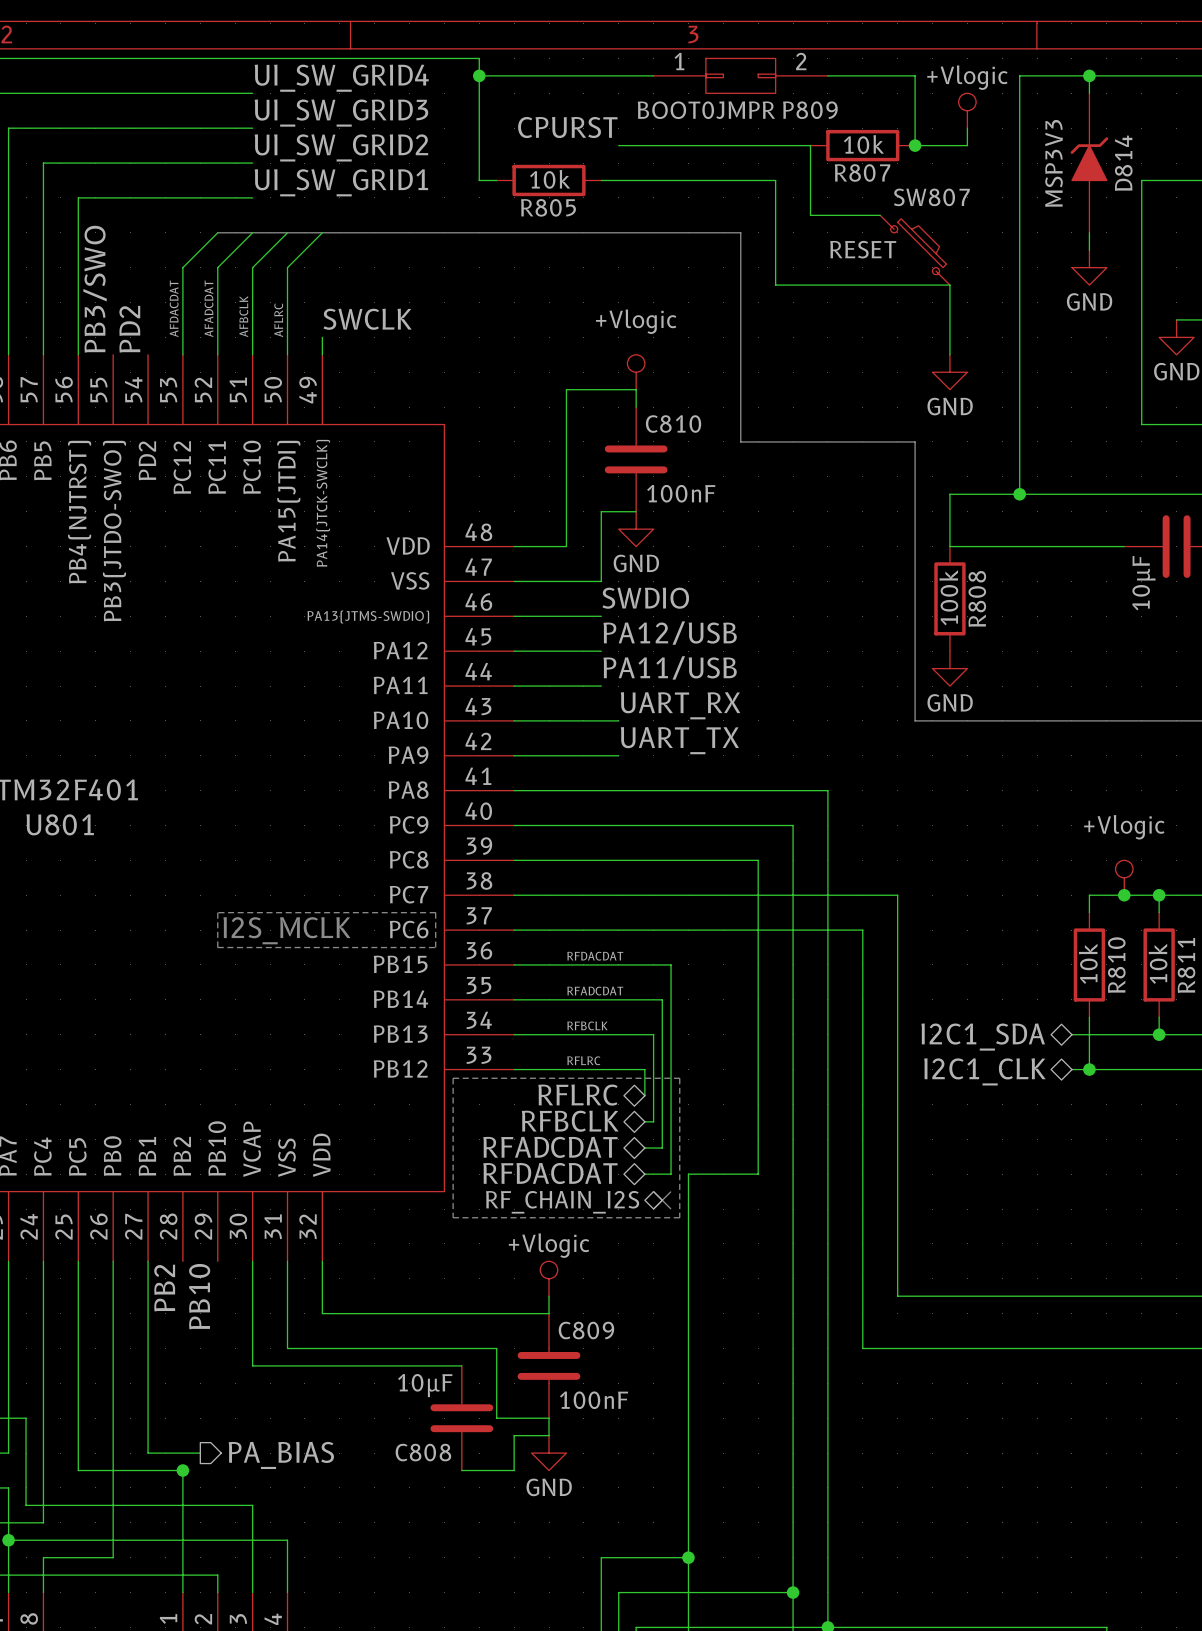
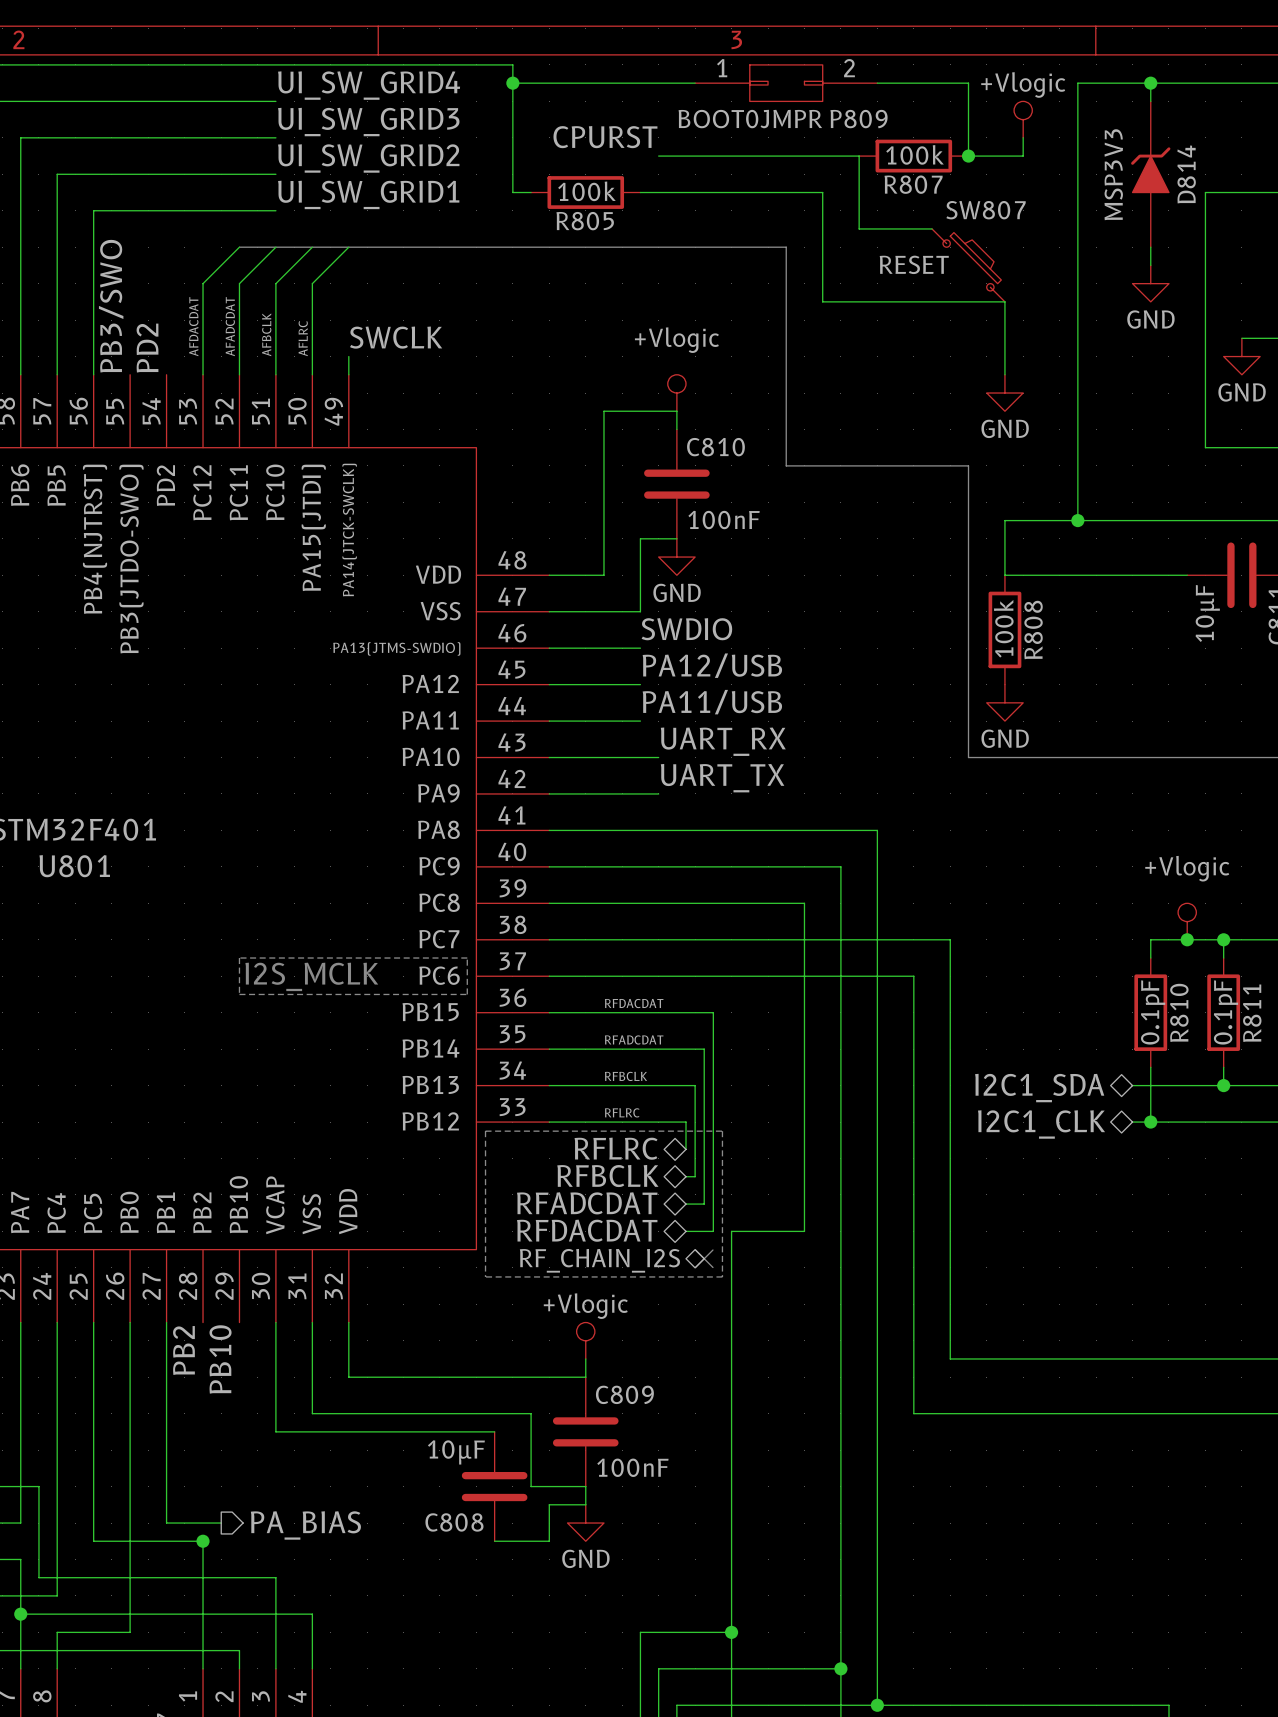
R807 value: 10k (863, 144) -> 100k (915, 154)
R805 value: 10k (550, 179) -> 100k (586, 191)
R810 value: 10k (1088, 963) -> 0.1pF (1153, 1012)
R811 value: 10k (1158, 963) -> 0.1pF (1225, 1012)

